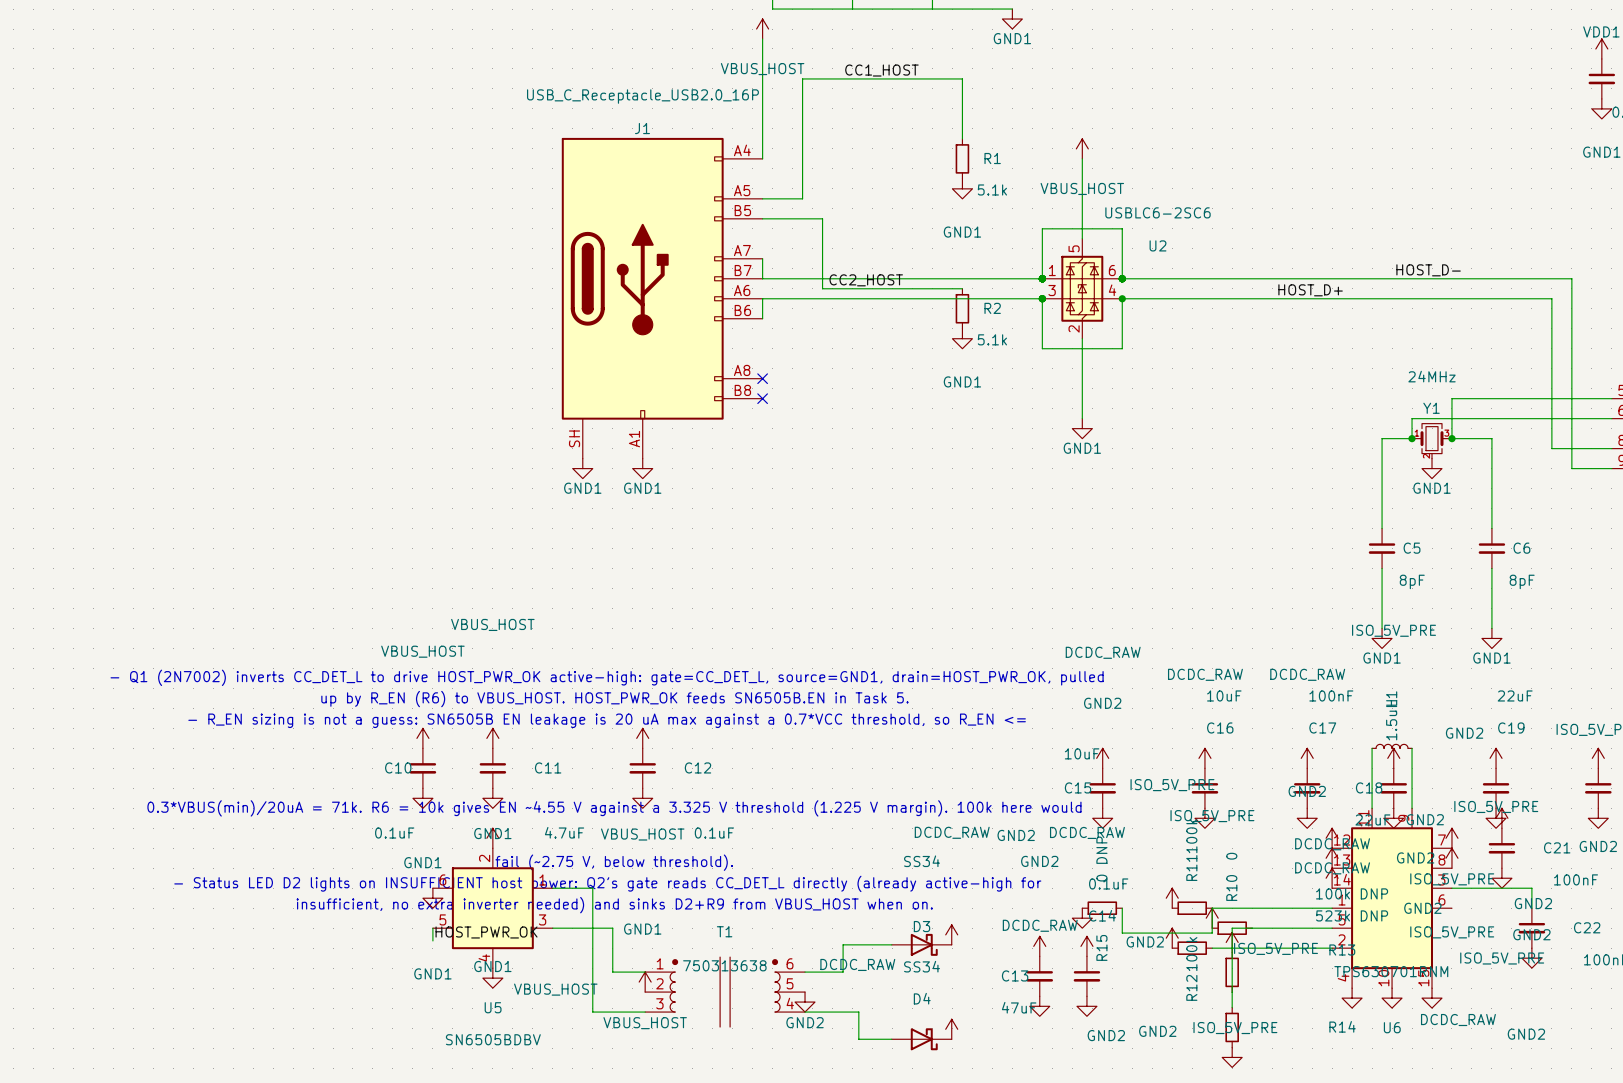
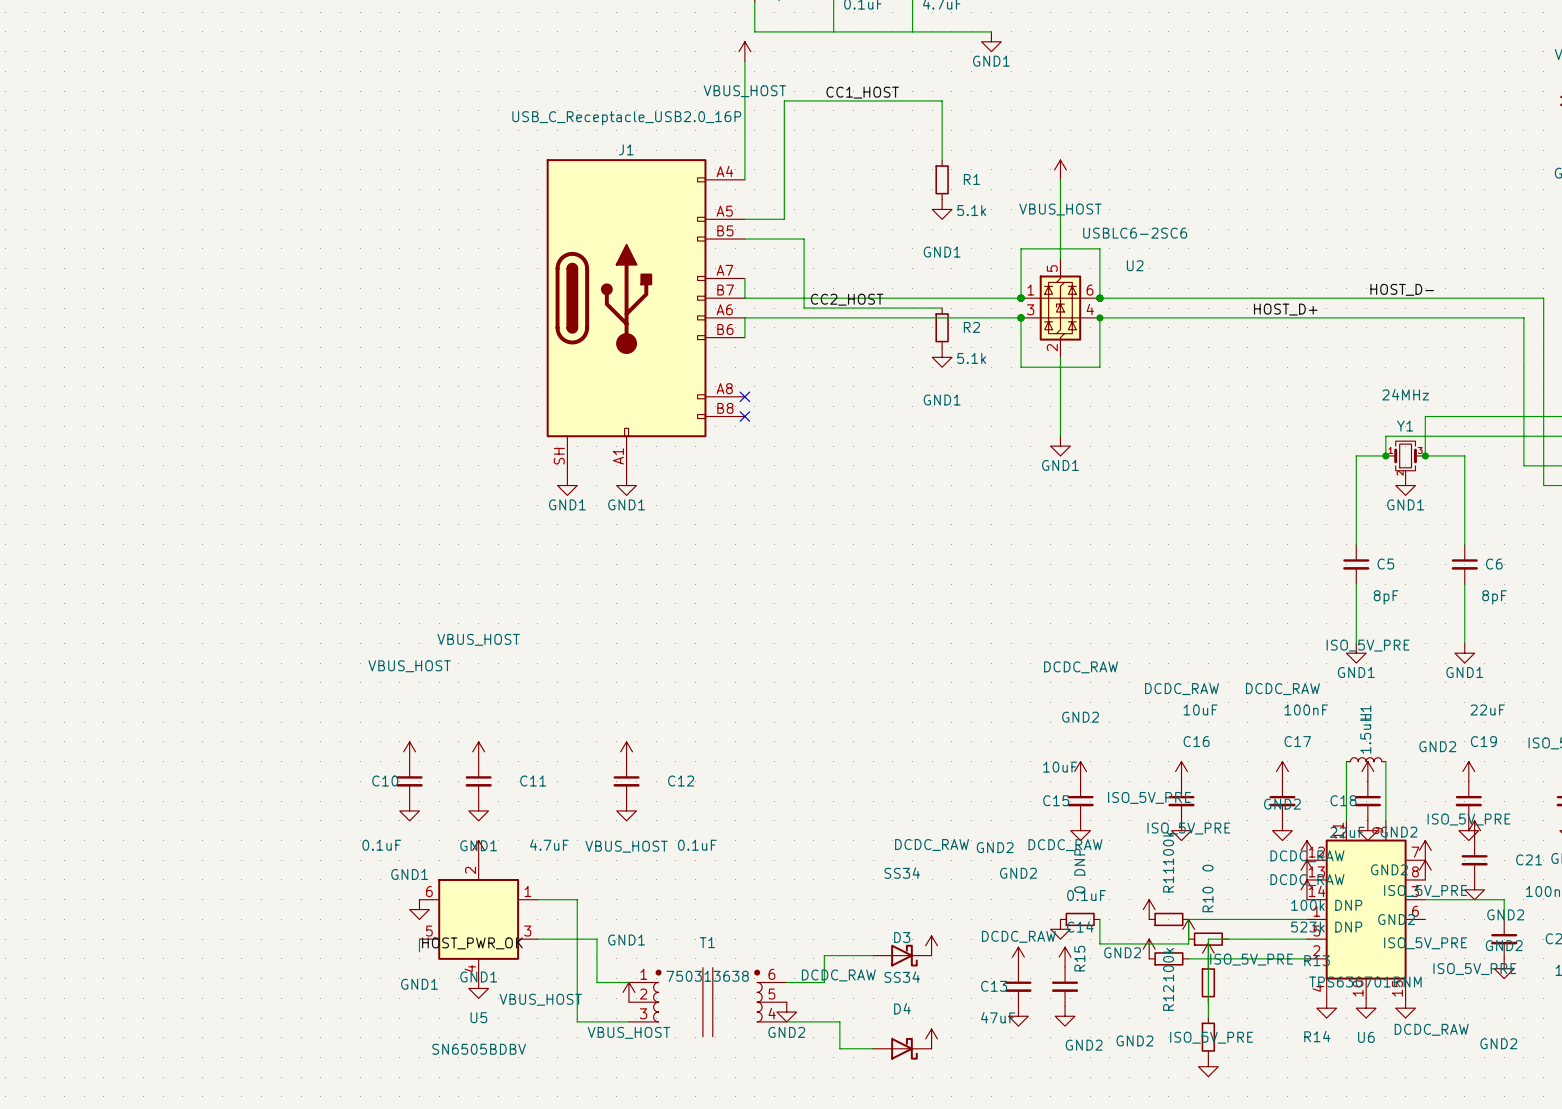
text: - Q1 (2N7002) inverts CC_DET_L to drive HOST_PWR_OK active-high: gate=CC_DET_L, source=GND1, drain=HOST_PWR_OK, pulled (607, 677) -> none
text: up by R_EN (R6) to VBUS_HOST. HOST_PWR_OK feeds SN6505B.EN in Task 5. (614, 699) -> none
text: - R_EN sizing is not a guess: SN6505B EN leakage is 20 uA max against a 0.7*VCC threshold, so R_EN <= (607, 720) -> none
text: 0.3*VBUS(min)/20uA = 71k. R6 = 10k gives EN ~4.55 V against a 3.325 V threshold (1.225 V margin). 100k here would (614, 808) -> none
text: fail (~2.75 V, below threshold). (614, 862) -> none
text: - Status LED D2 lights on INSUFFICIENT host power: Q2's gate reads CC_DET_L directly (already active-high for (607, 883) -> none
text: insufficient, no extra inverter needed) and sinks D2+R9 from VBUS_HOST when on. (614, 905) -> none

